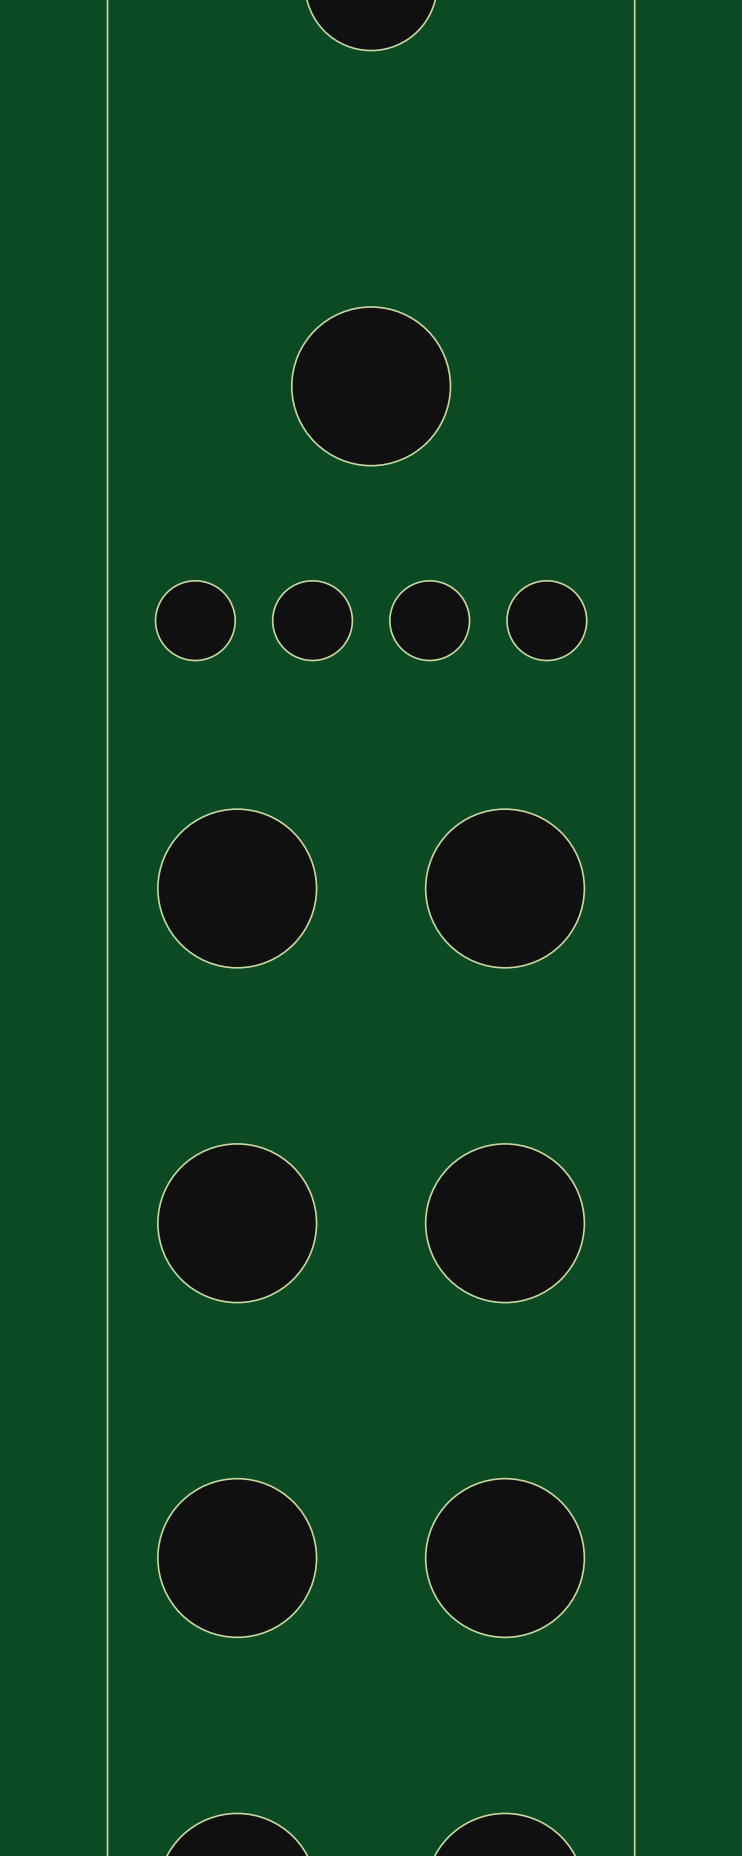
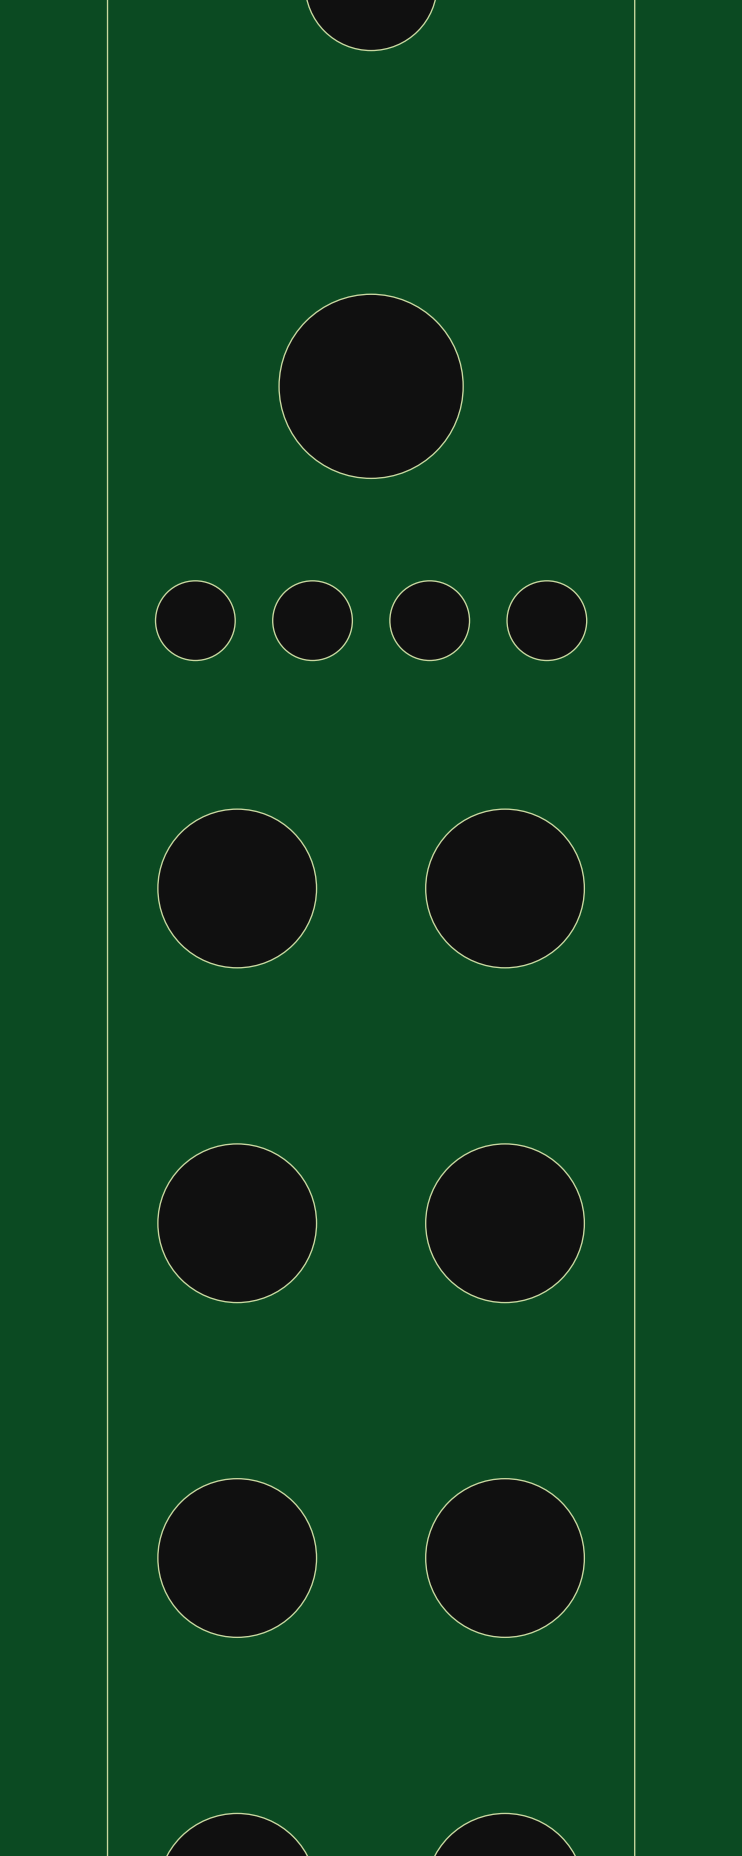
hole size: [291, 306, 451, 466] -> [279, 294, 464, 479]

